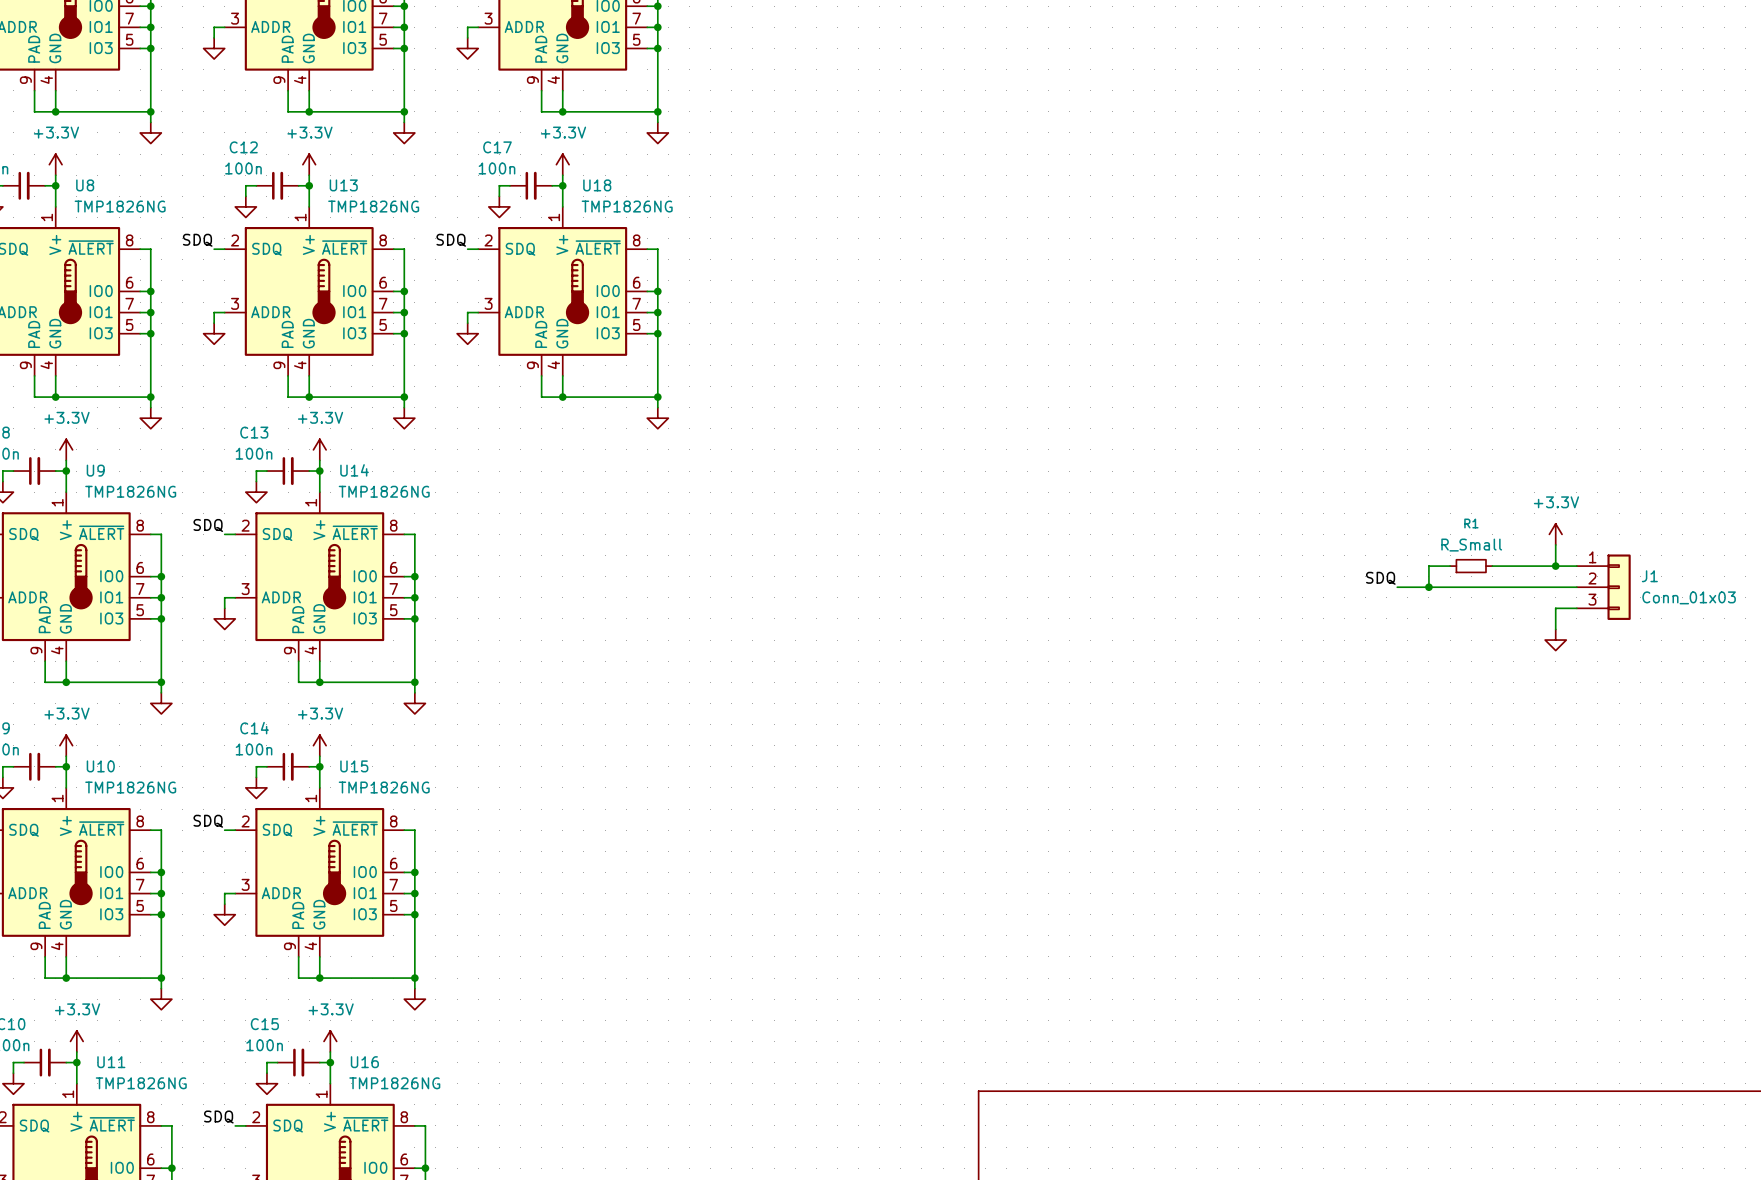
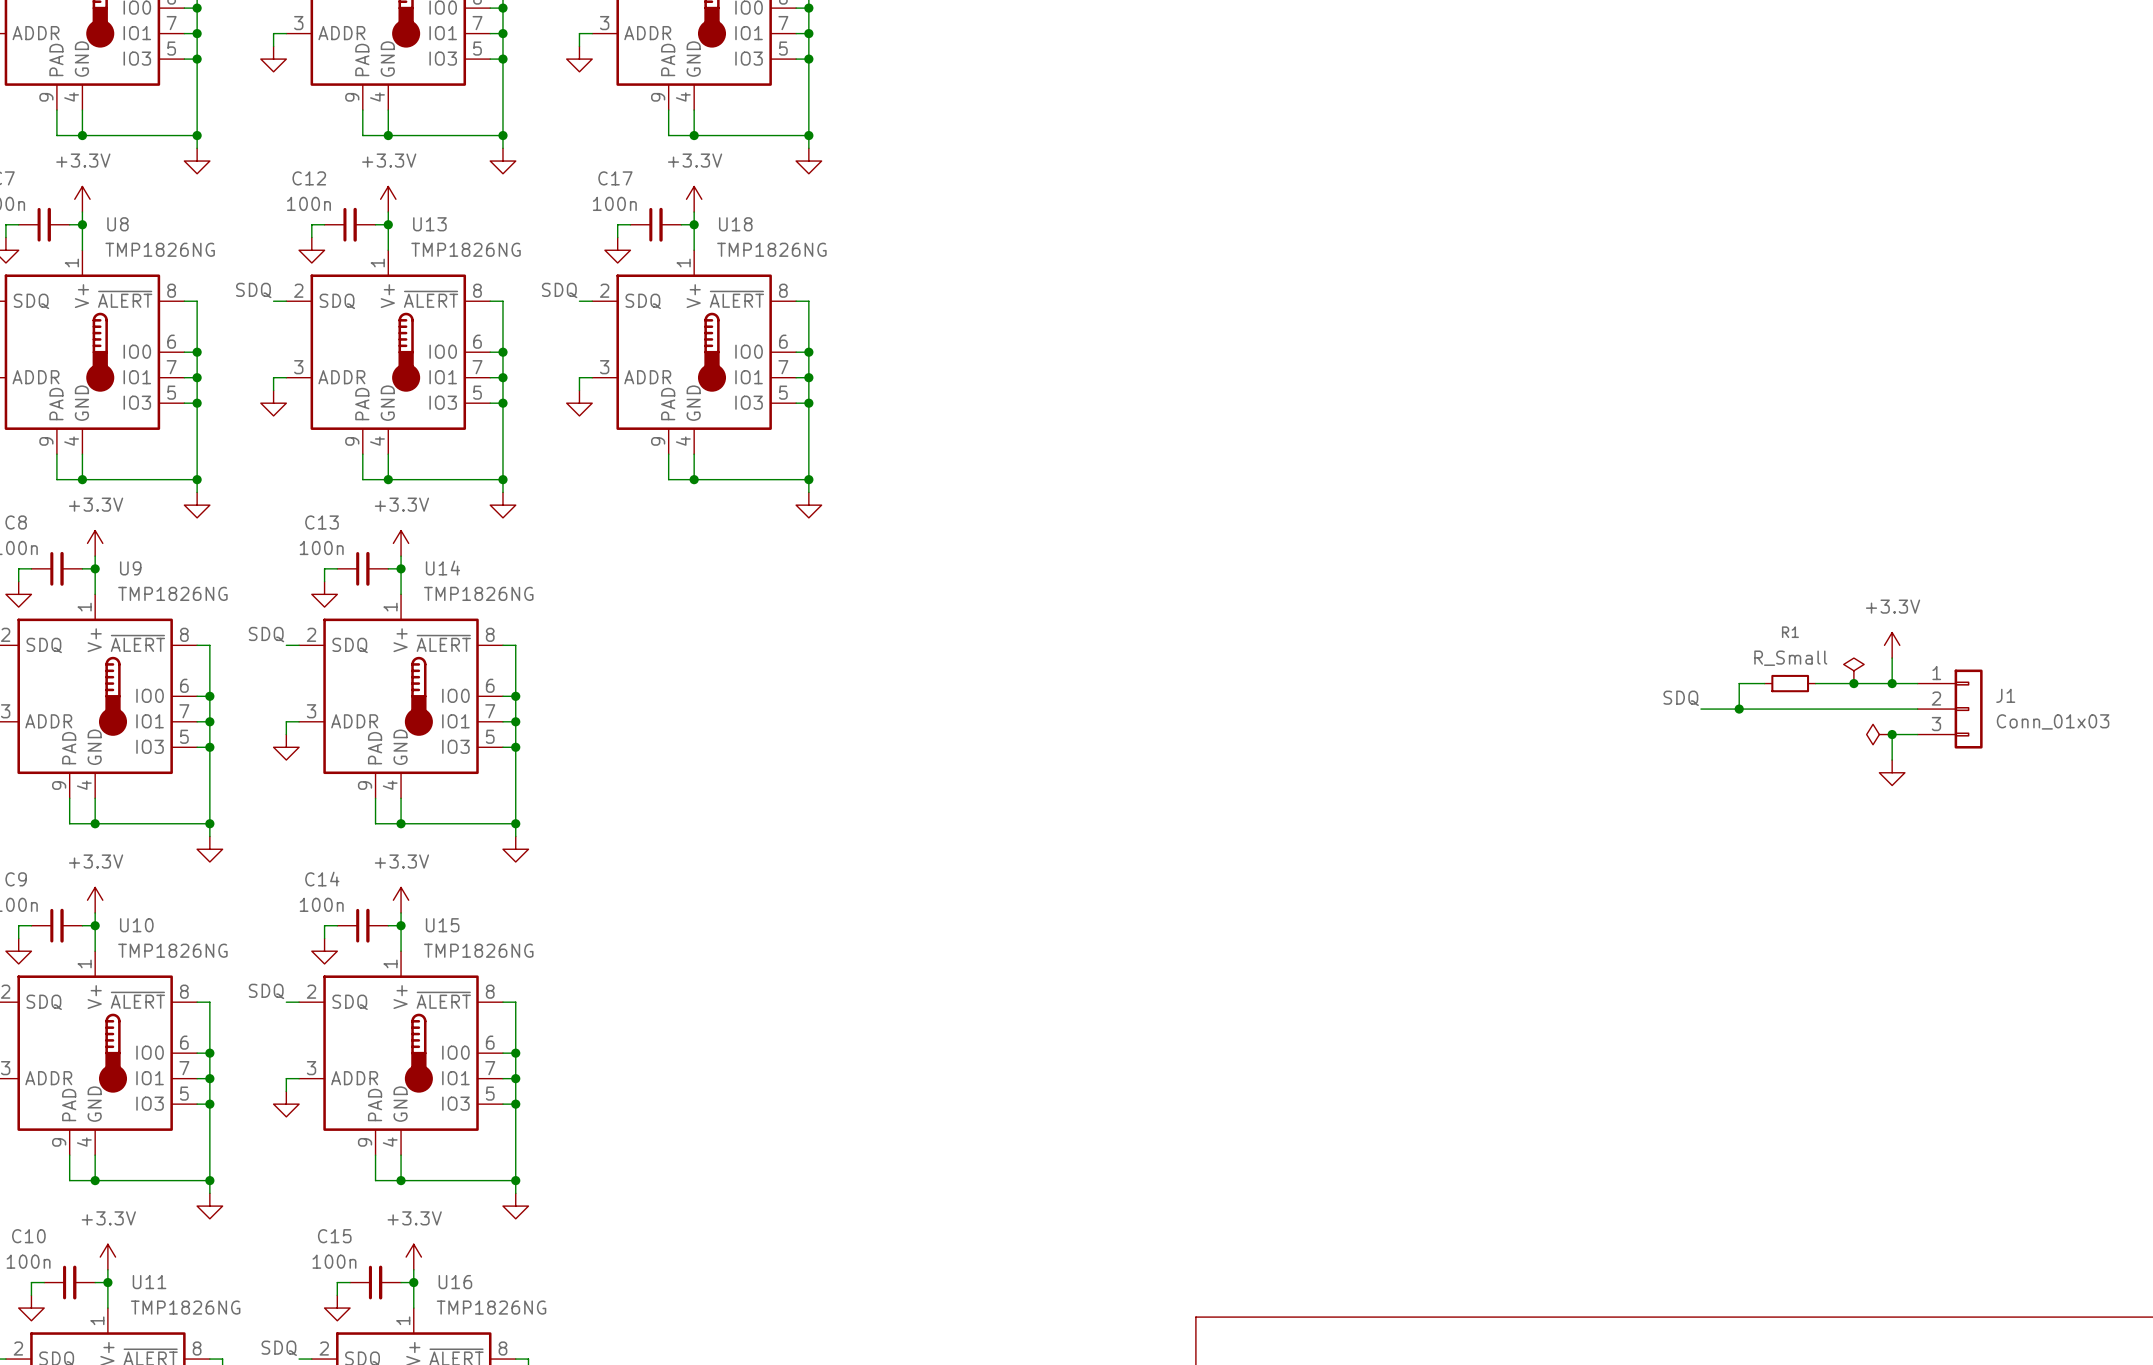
power symbol: none -> (1853, 670)
junction: none -> (1853, 683)
power symbol: none -> (1879, 734)
junction: none -> (1892, 734)

